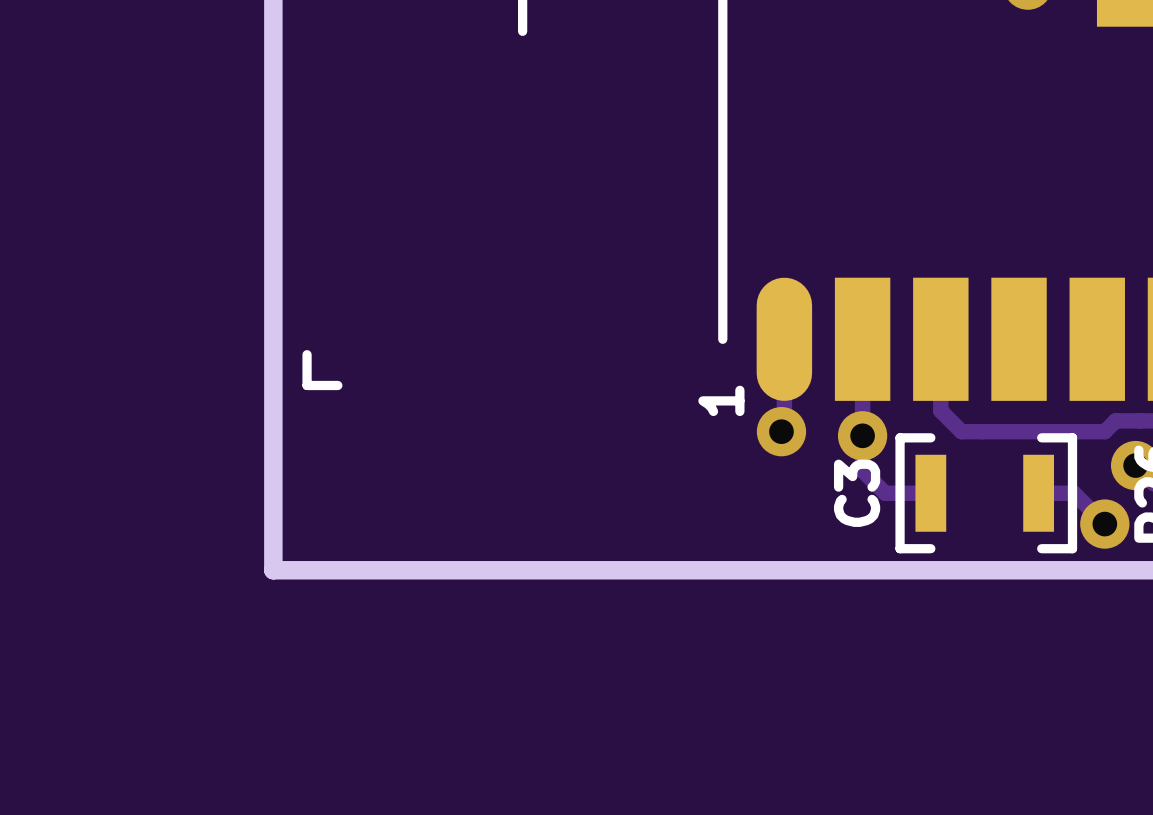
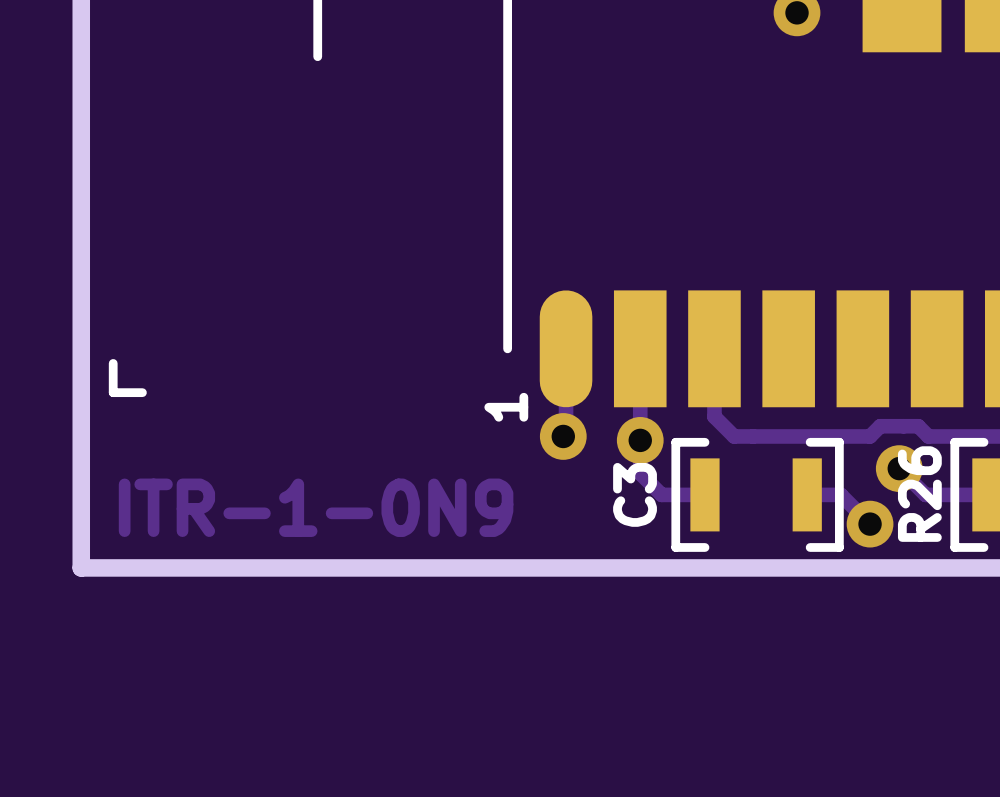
text: none -> ITR-1-0N9 (316, 507)

